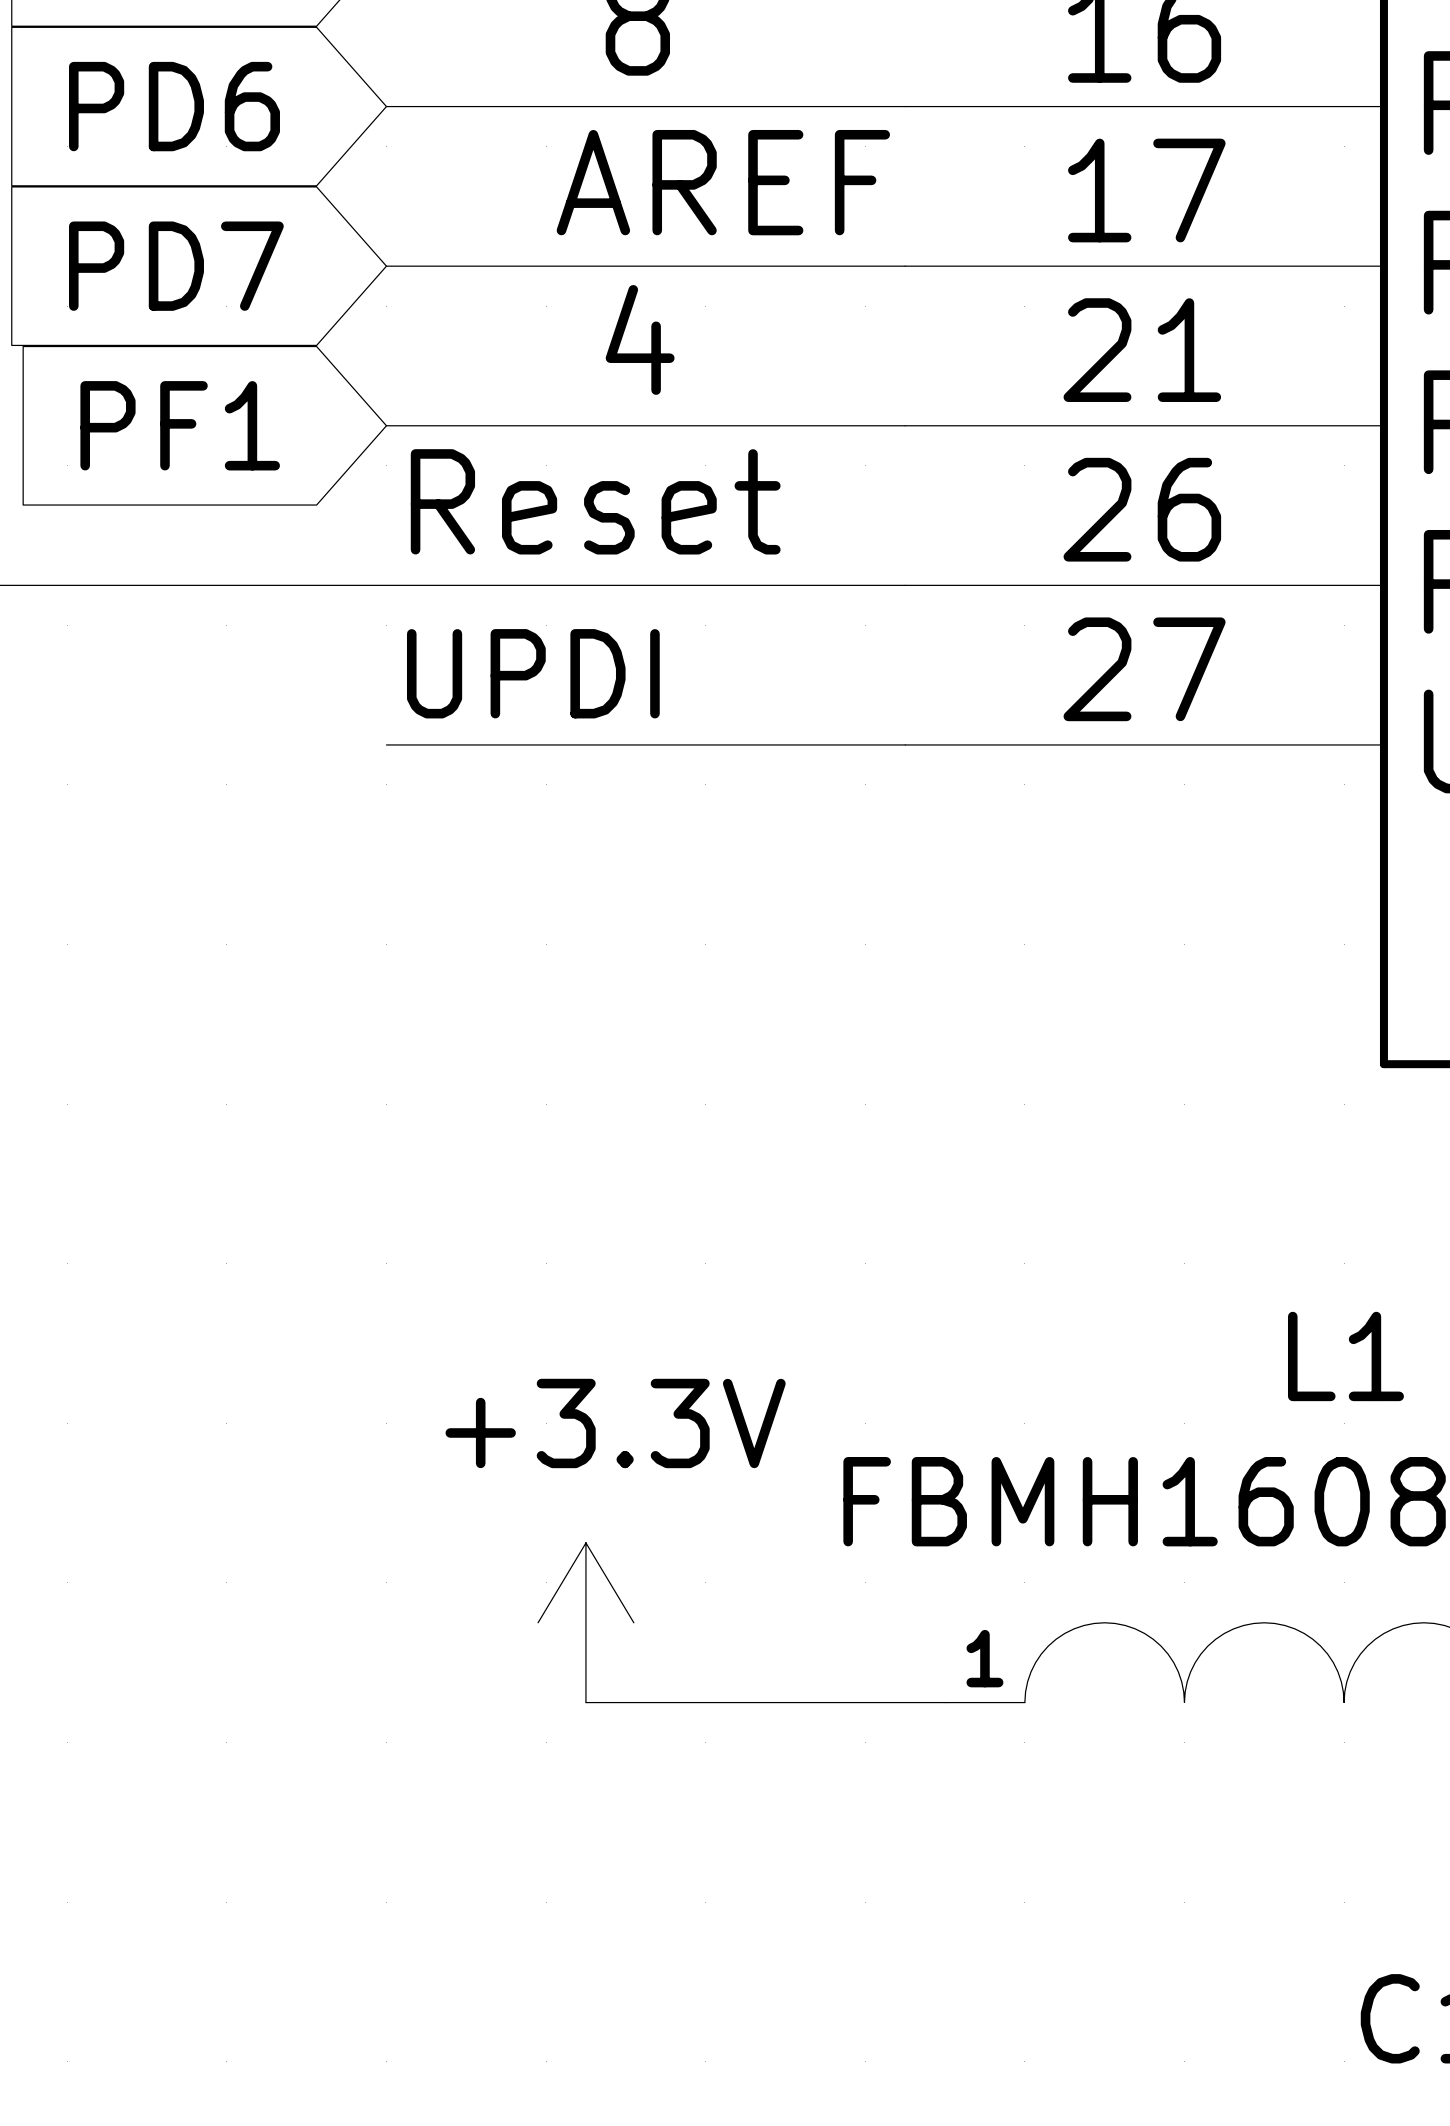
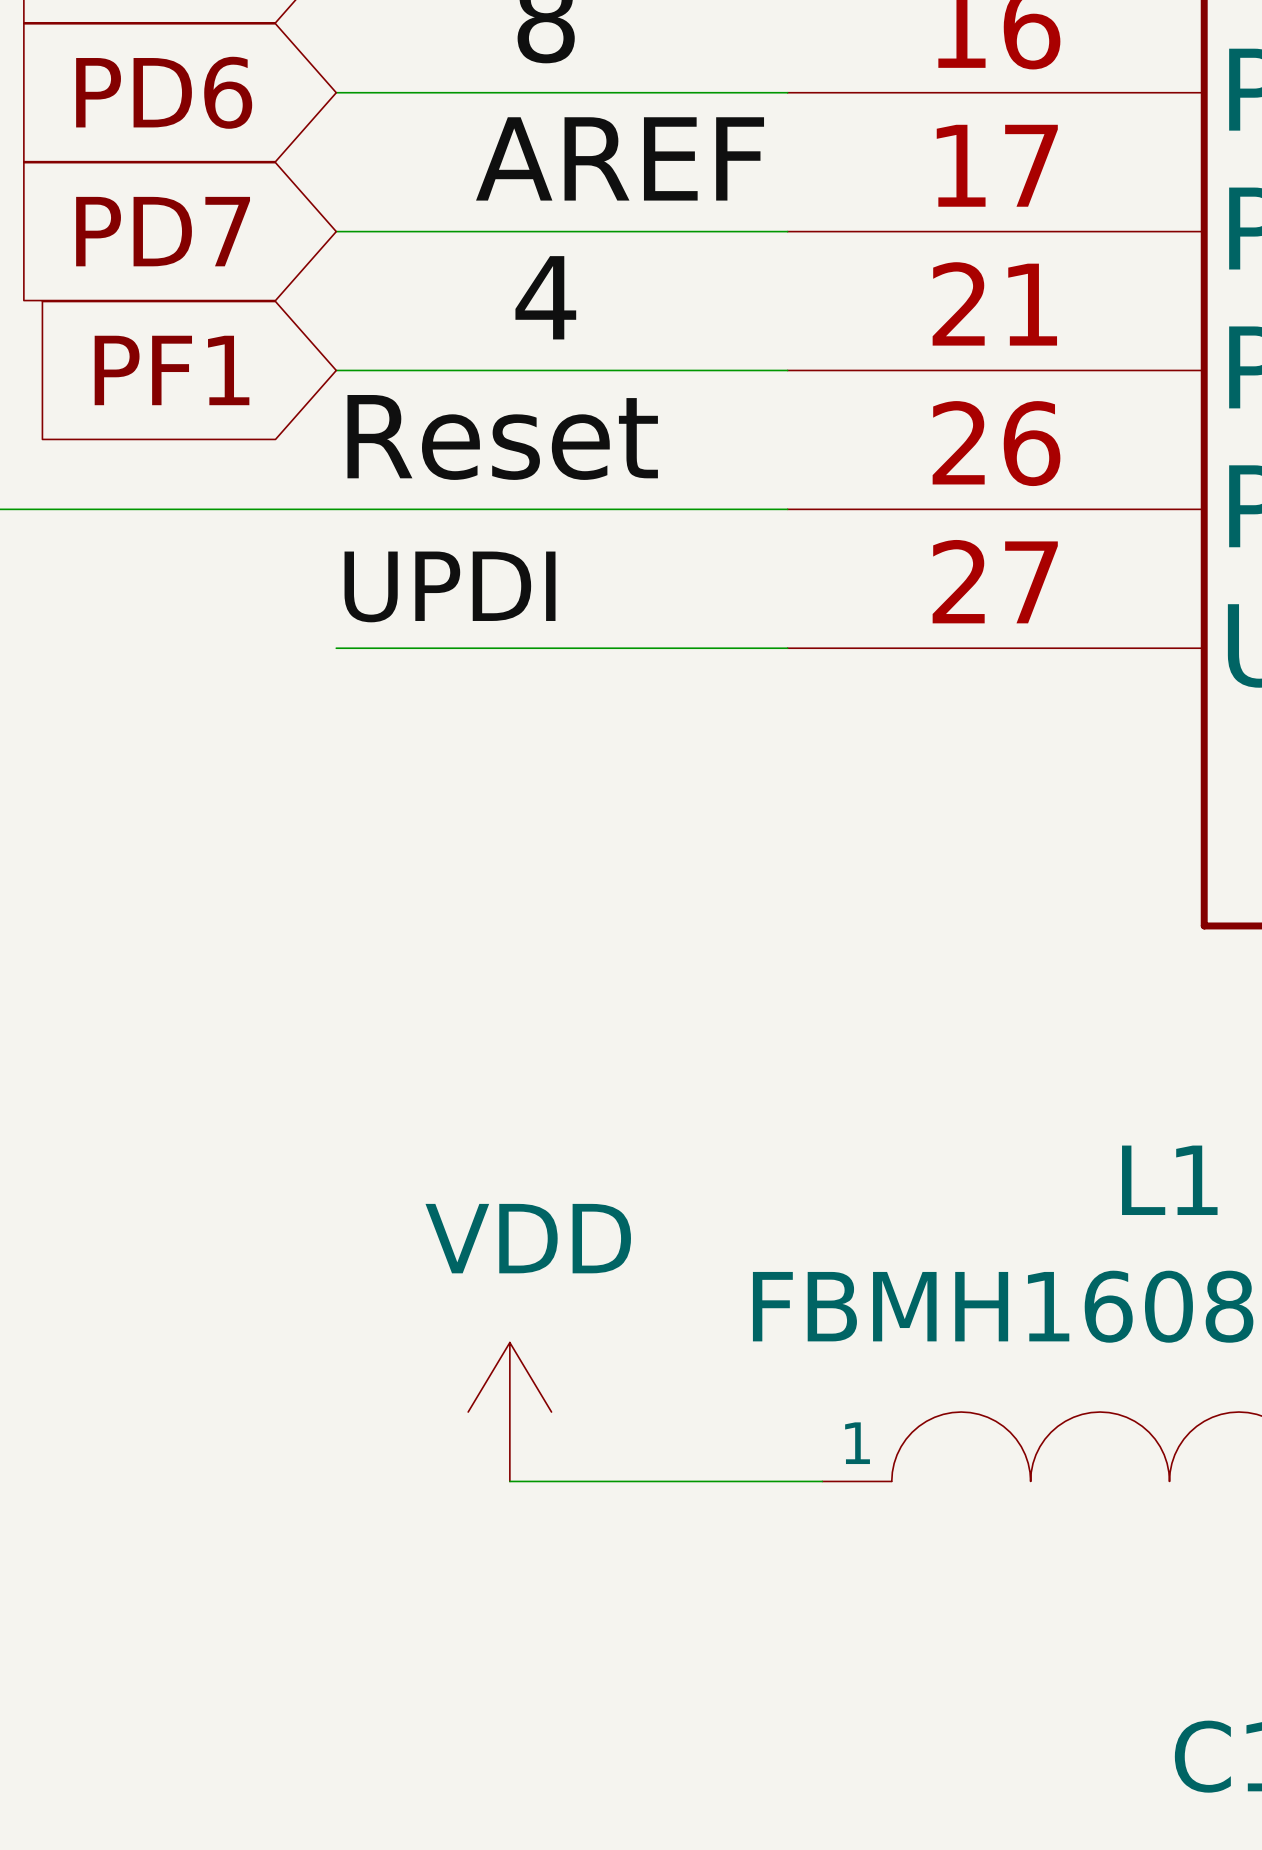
power symbol: +3.3V (585, 1622) -> VDD (509, 1412)

